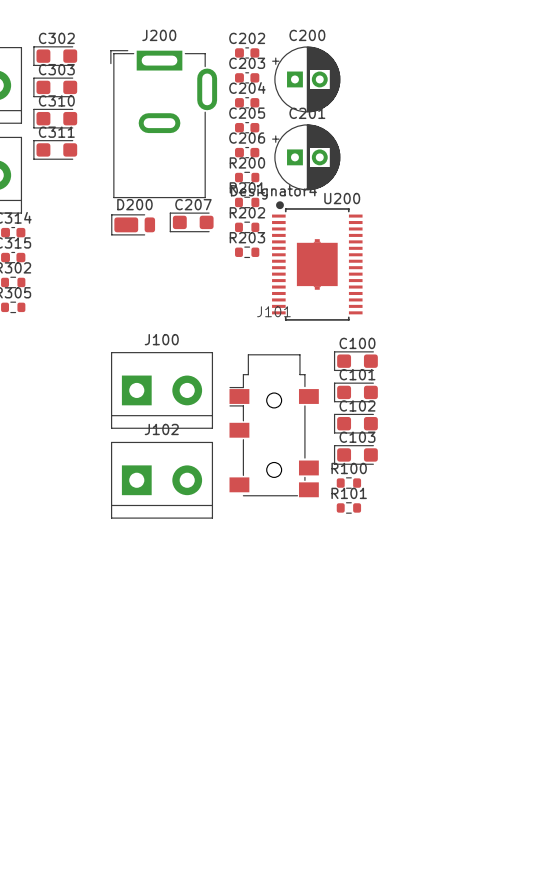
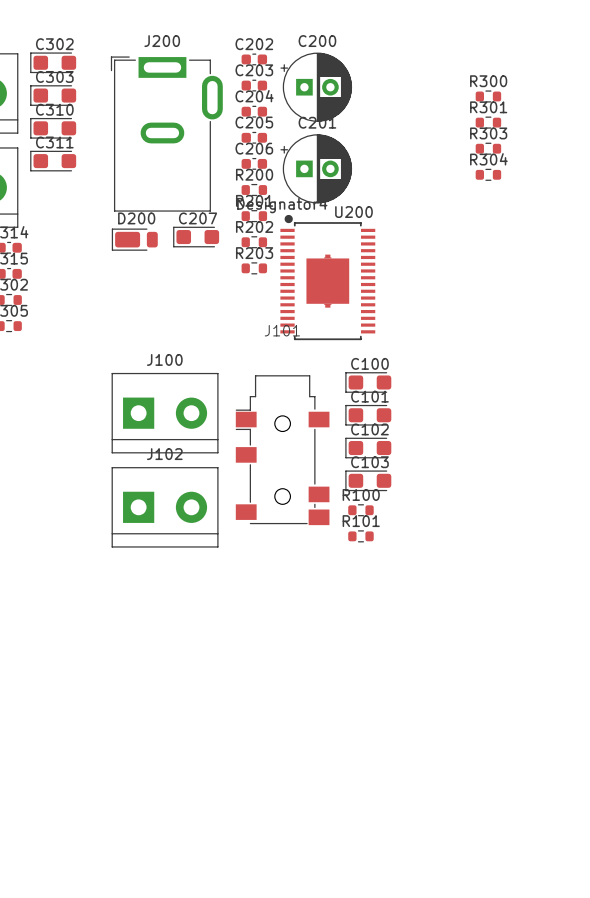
R300: none -> (488, 96)
R301: none -> (488, 122)
R303: none -> (488, 148)
R304: none -> (488, 174)

